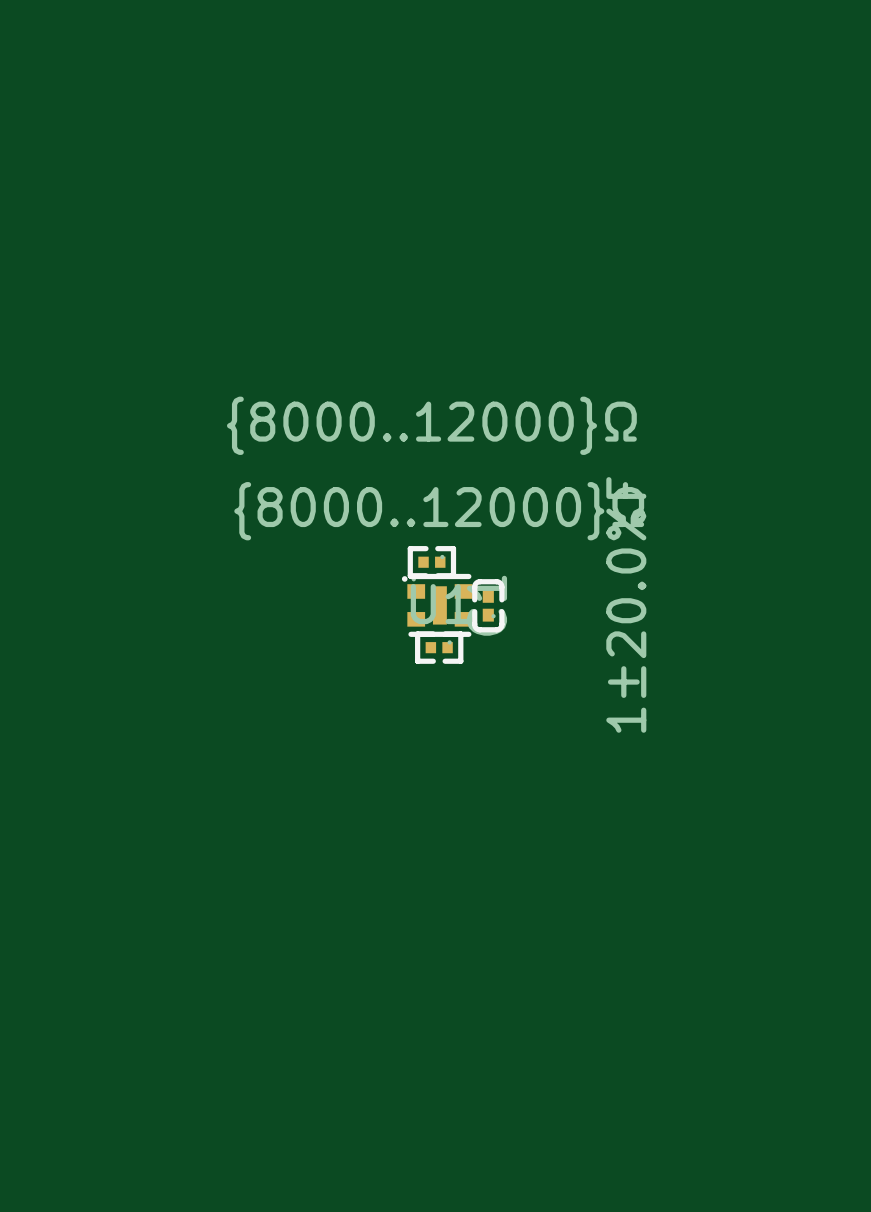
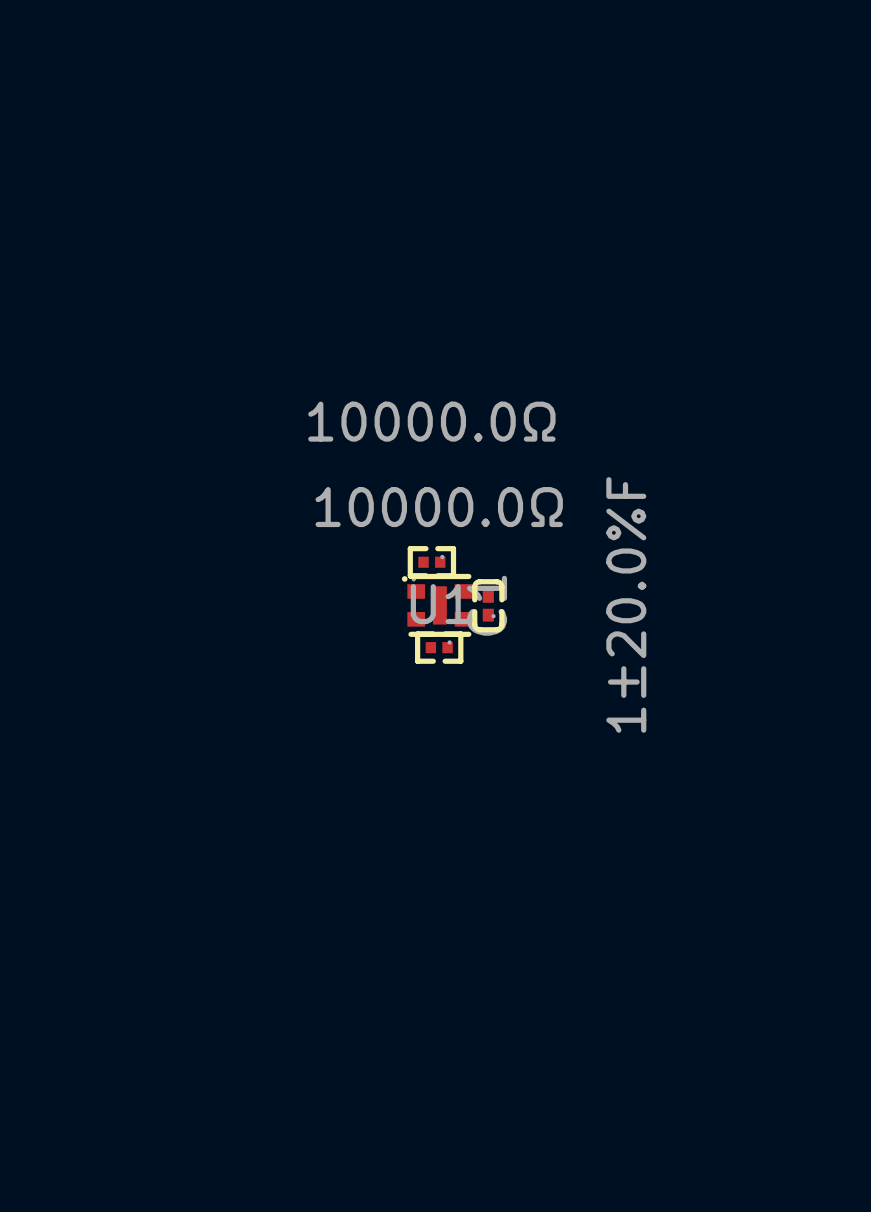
part value: {8000..12000}Ω (431, 425) -> 10000.0Ω (431, 421)
part value: {8000..12000}Ω (439, 511) -> 10000.0Ω (439, 507)

